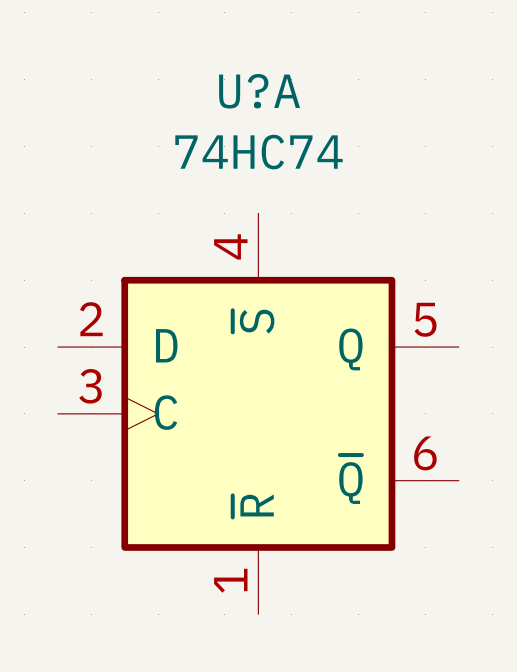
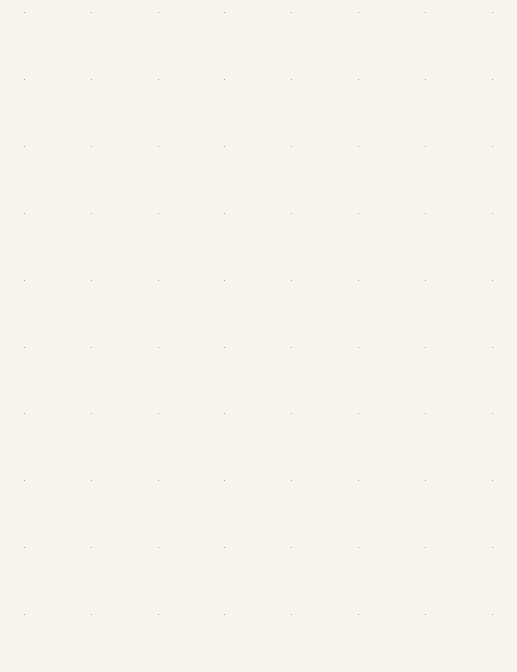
U?A: 74HC74 (258, 413) -> none

